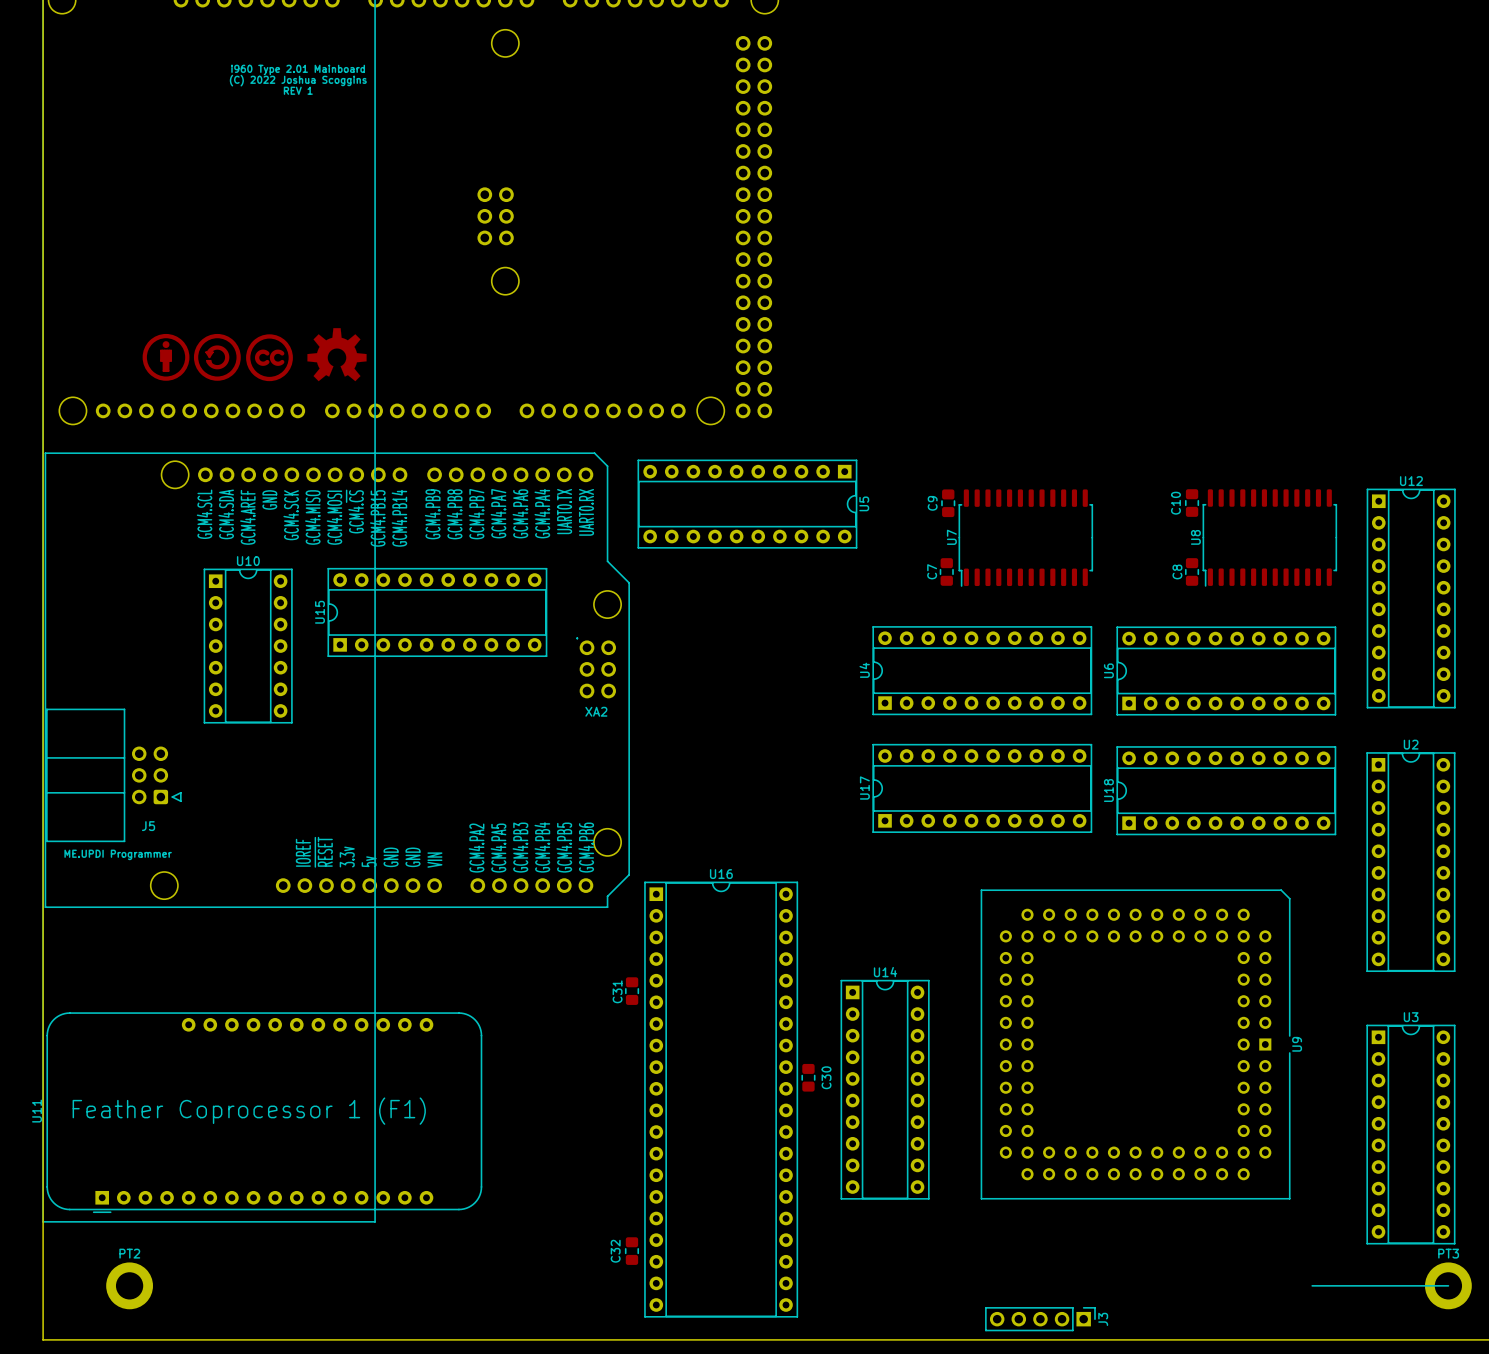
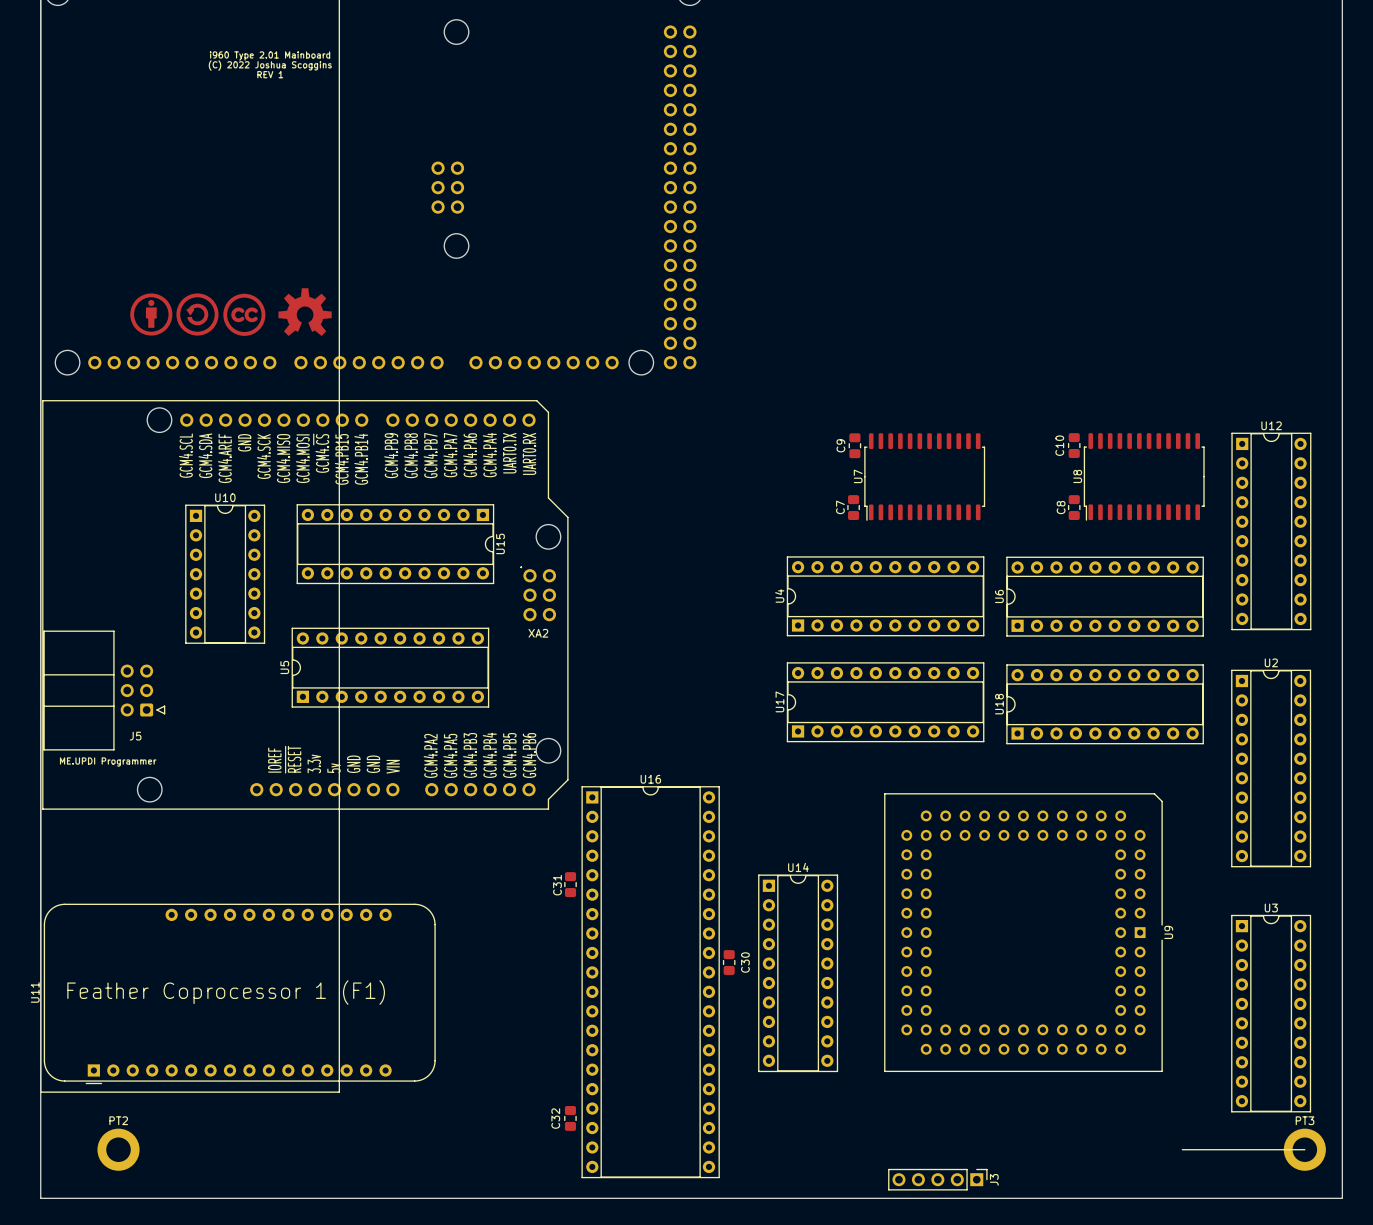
U5 rotation: 0° (747, 504) -> 180° (390, 667)
U5 position: (747, 504) -> (390, 667)
U15 rotation: 0° (437, 612) -> 180° (395, 544)

